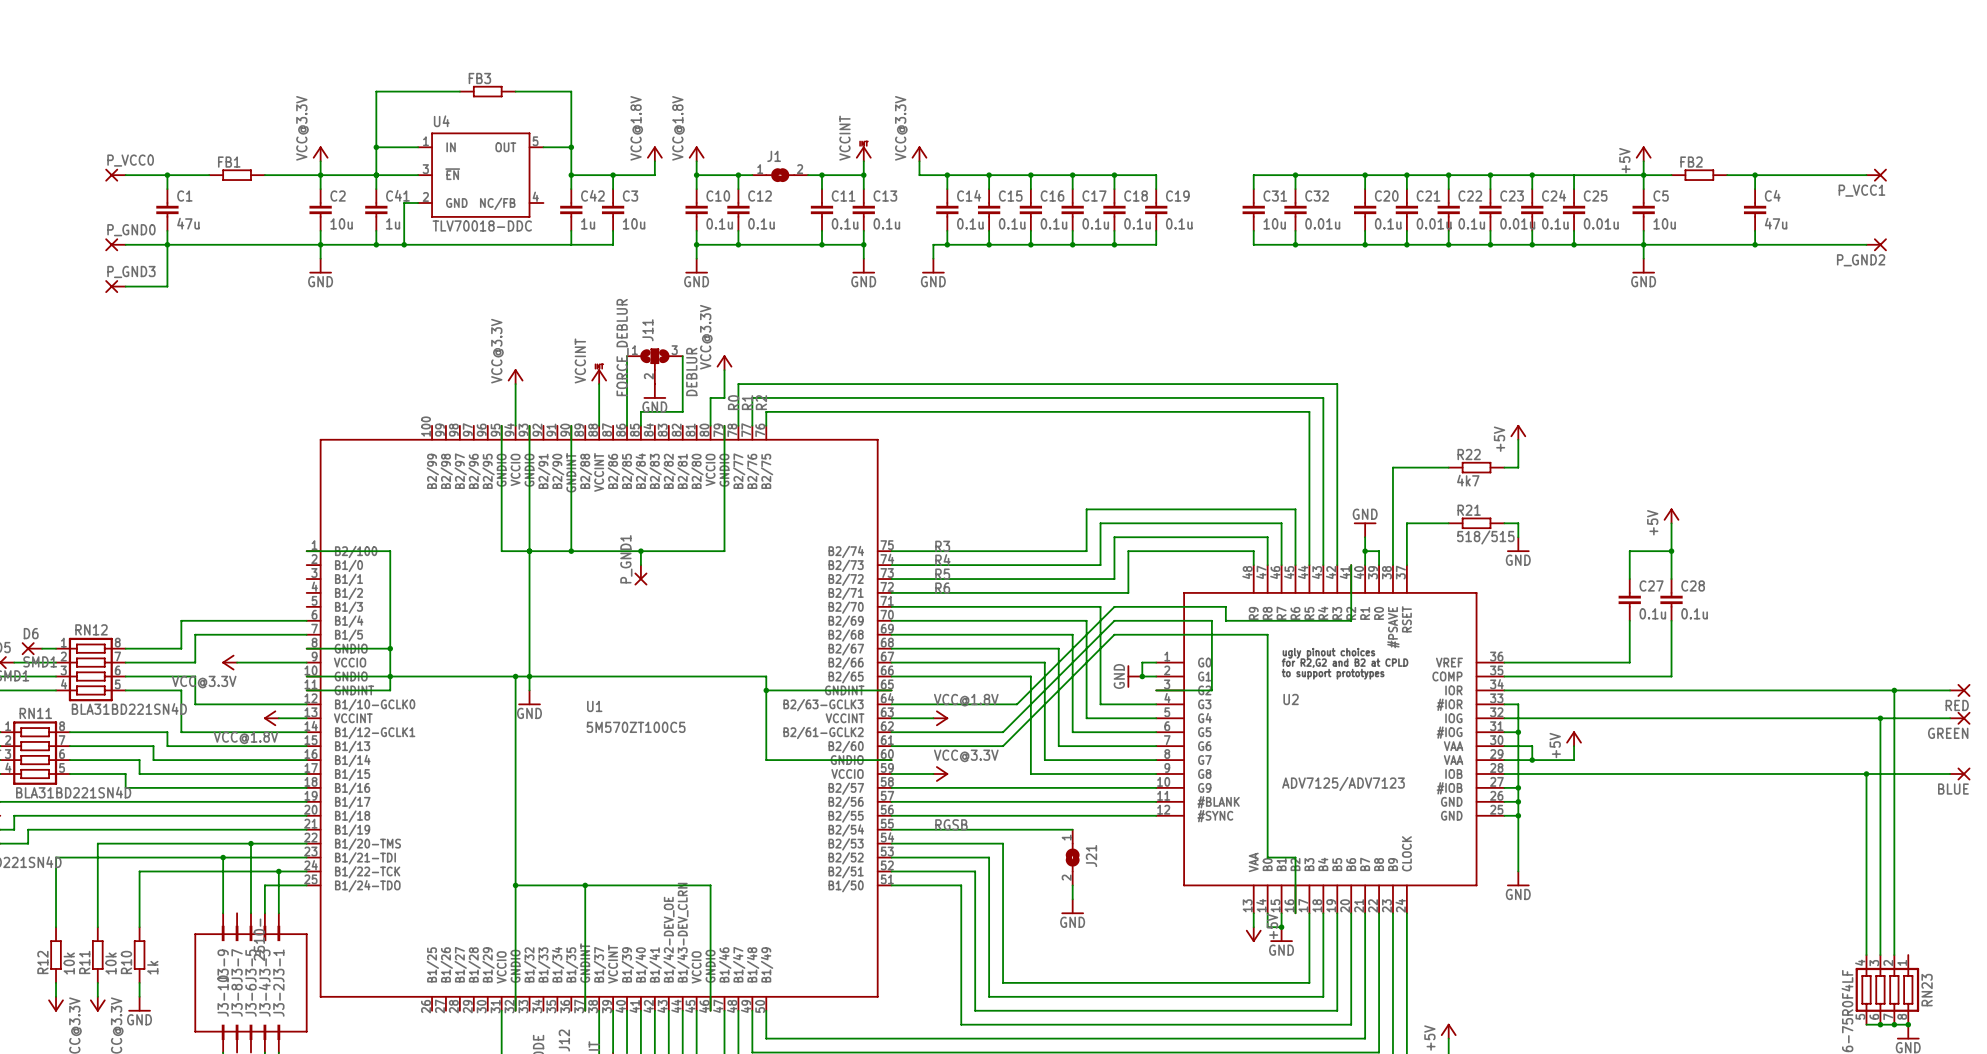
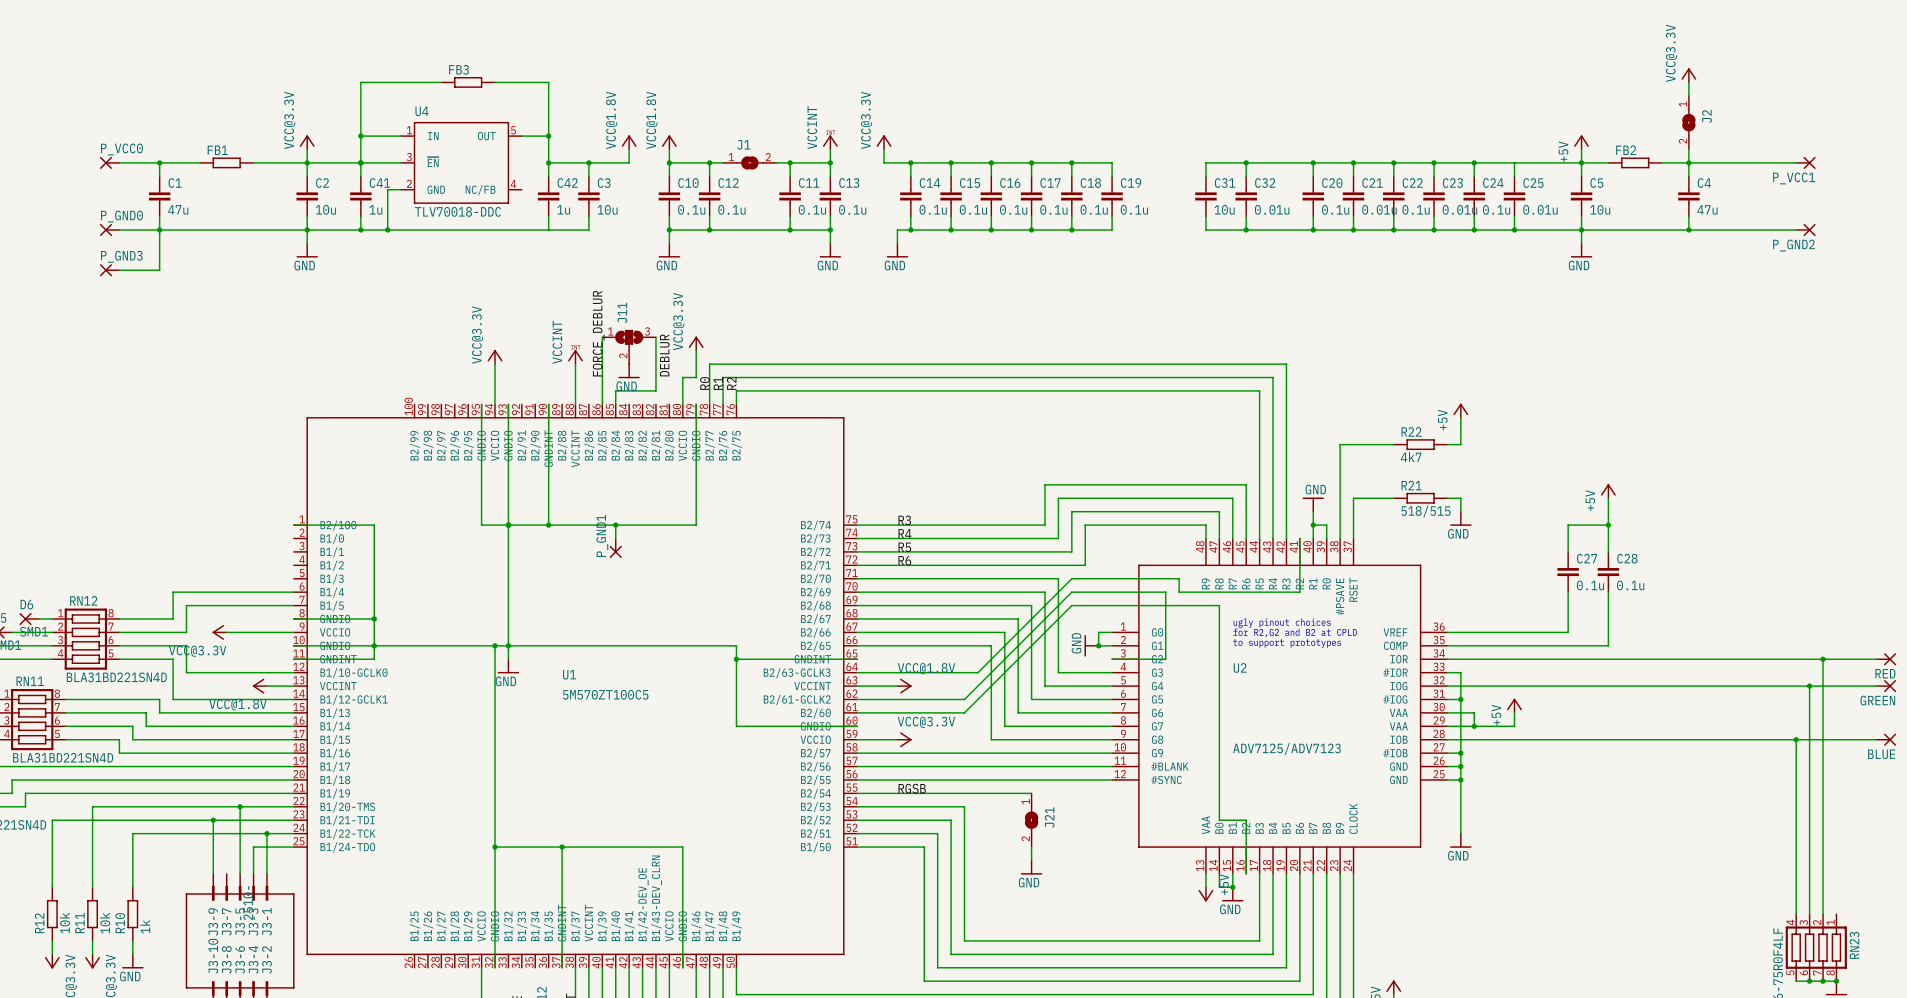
power symbol: none -> VCC@3.3V (1688, 75)
wire: none -> (1688, 82) (1688, 95)
J2: none -> (1688, 122)
wire: none -> (1688, 149) (1688, 162)

